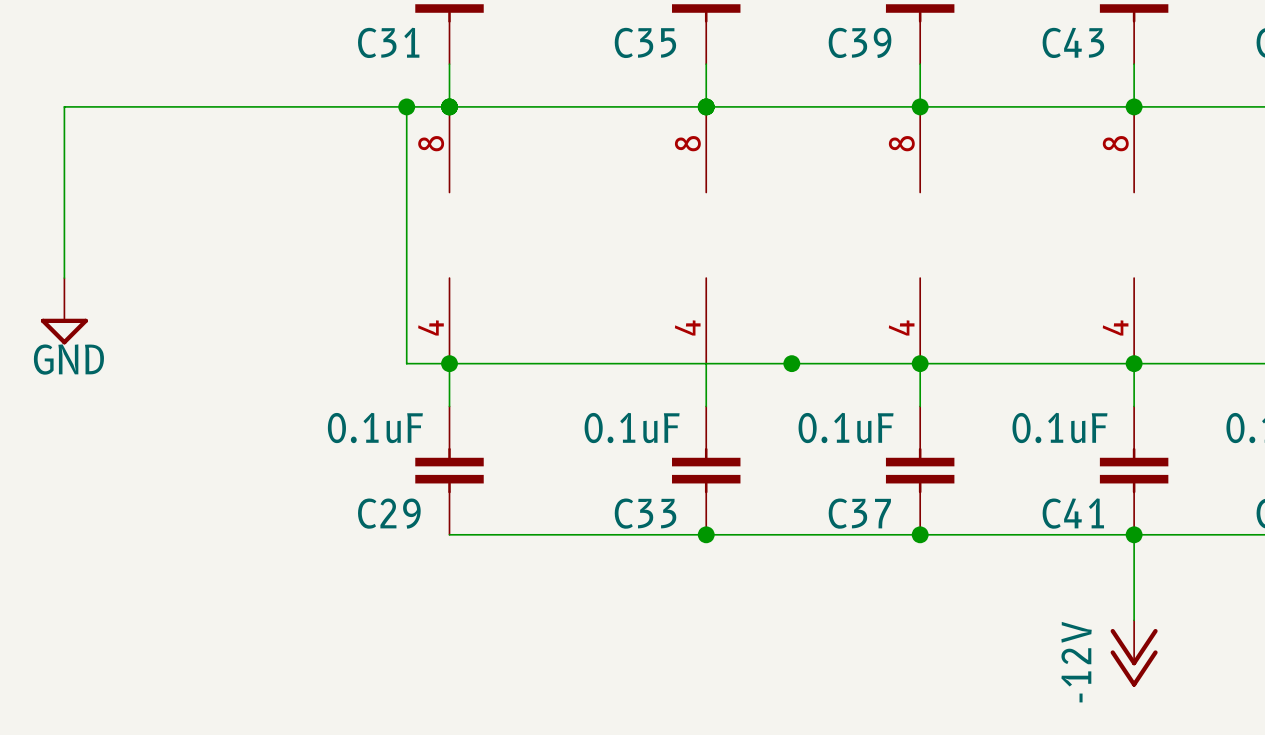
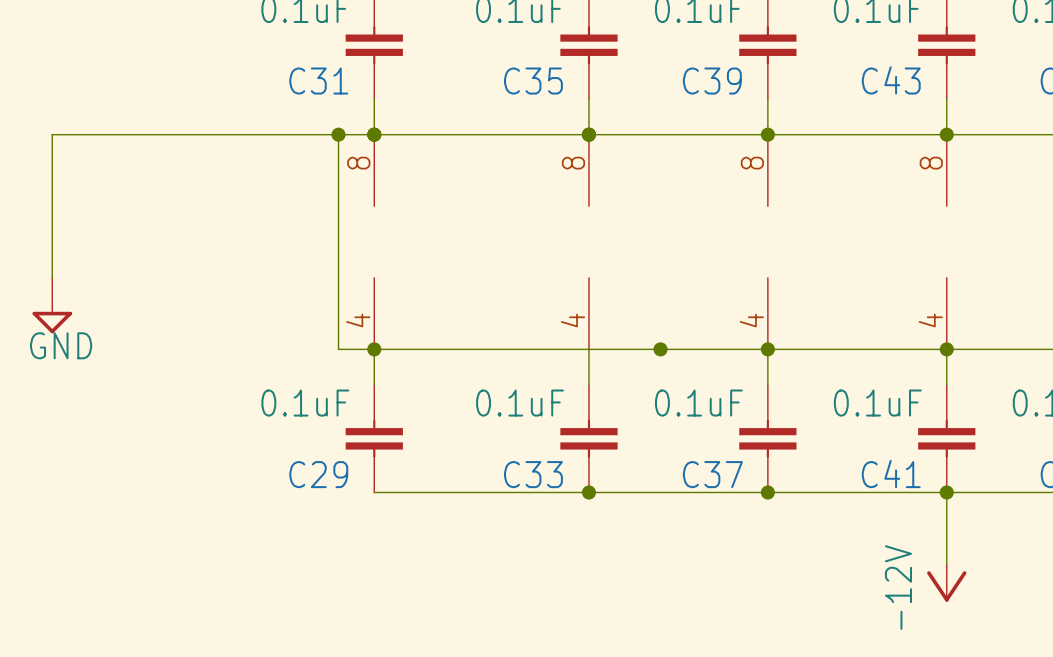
power symbol shape: [1110, 620, 1158, 687] -> [927, 564, 967, 602]

